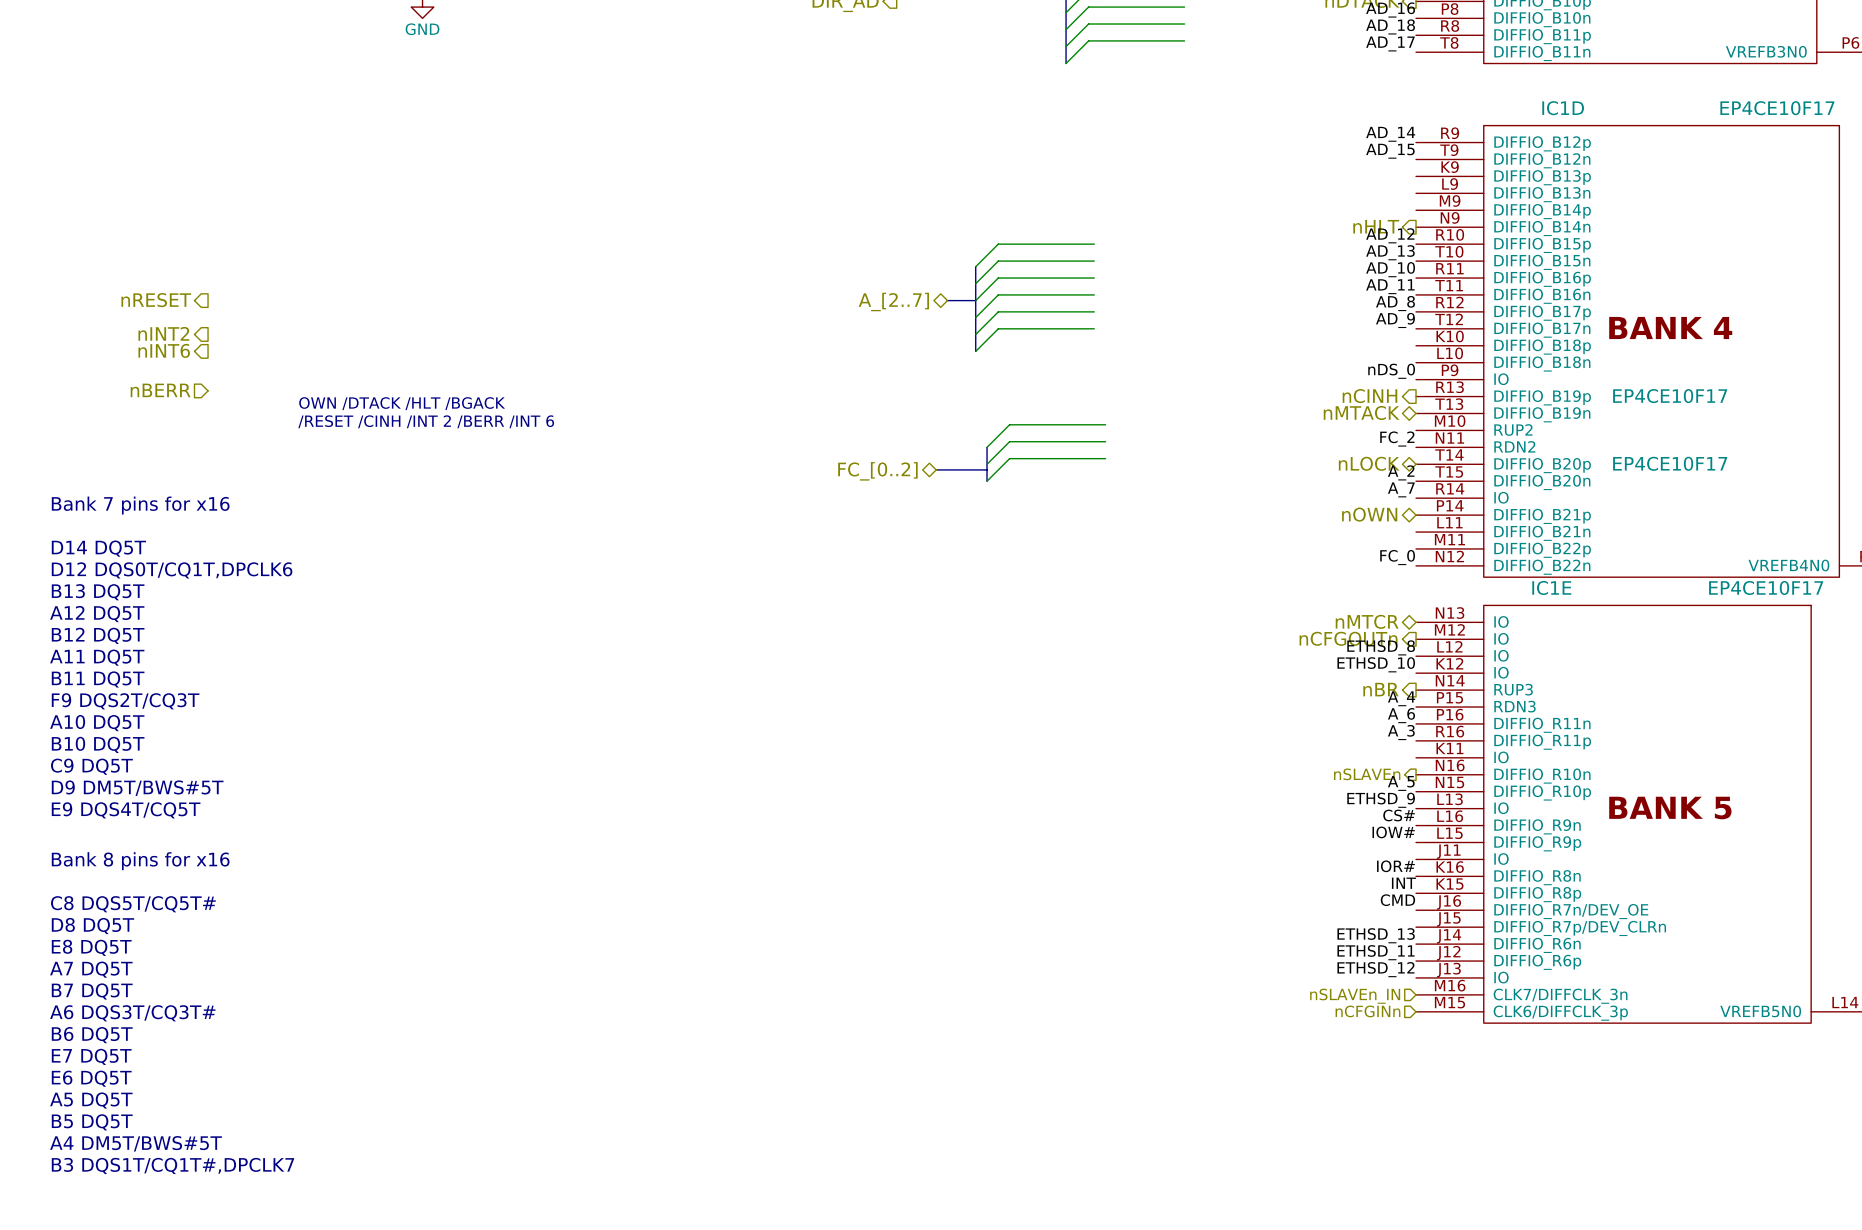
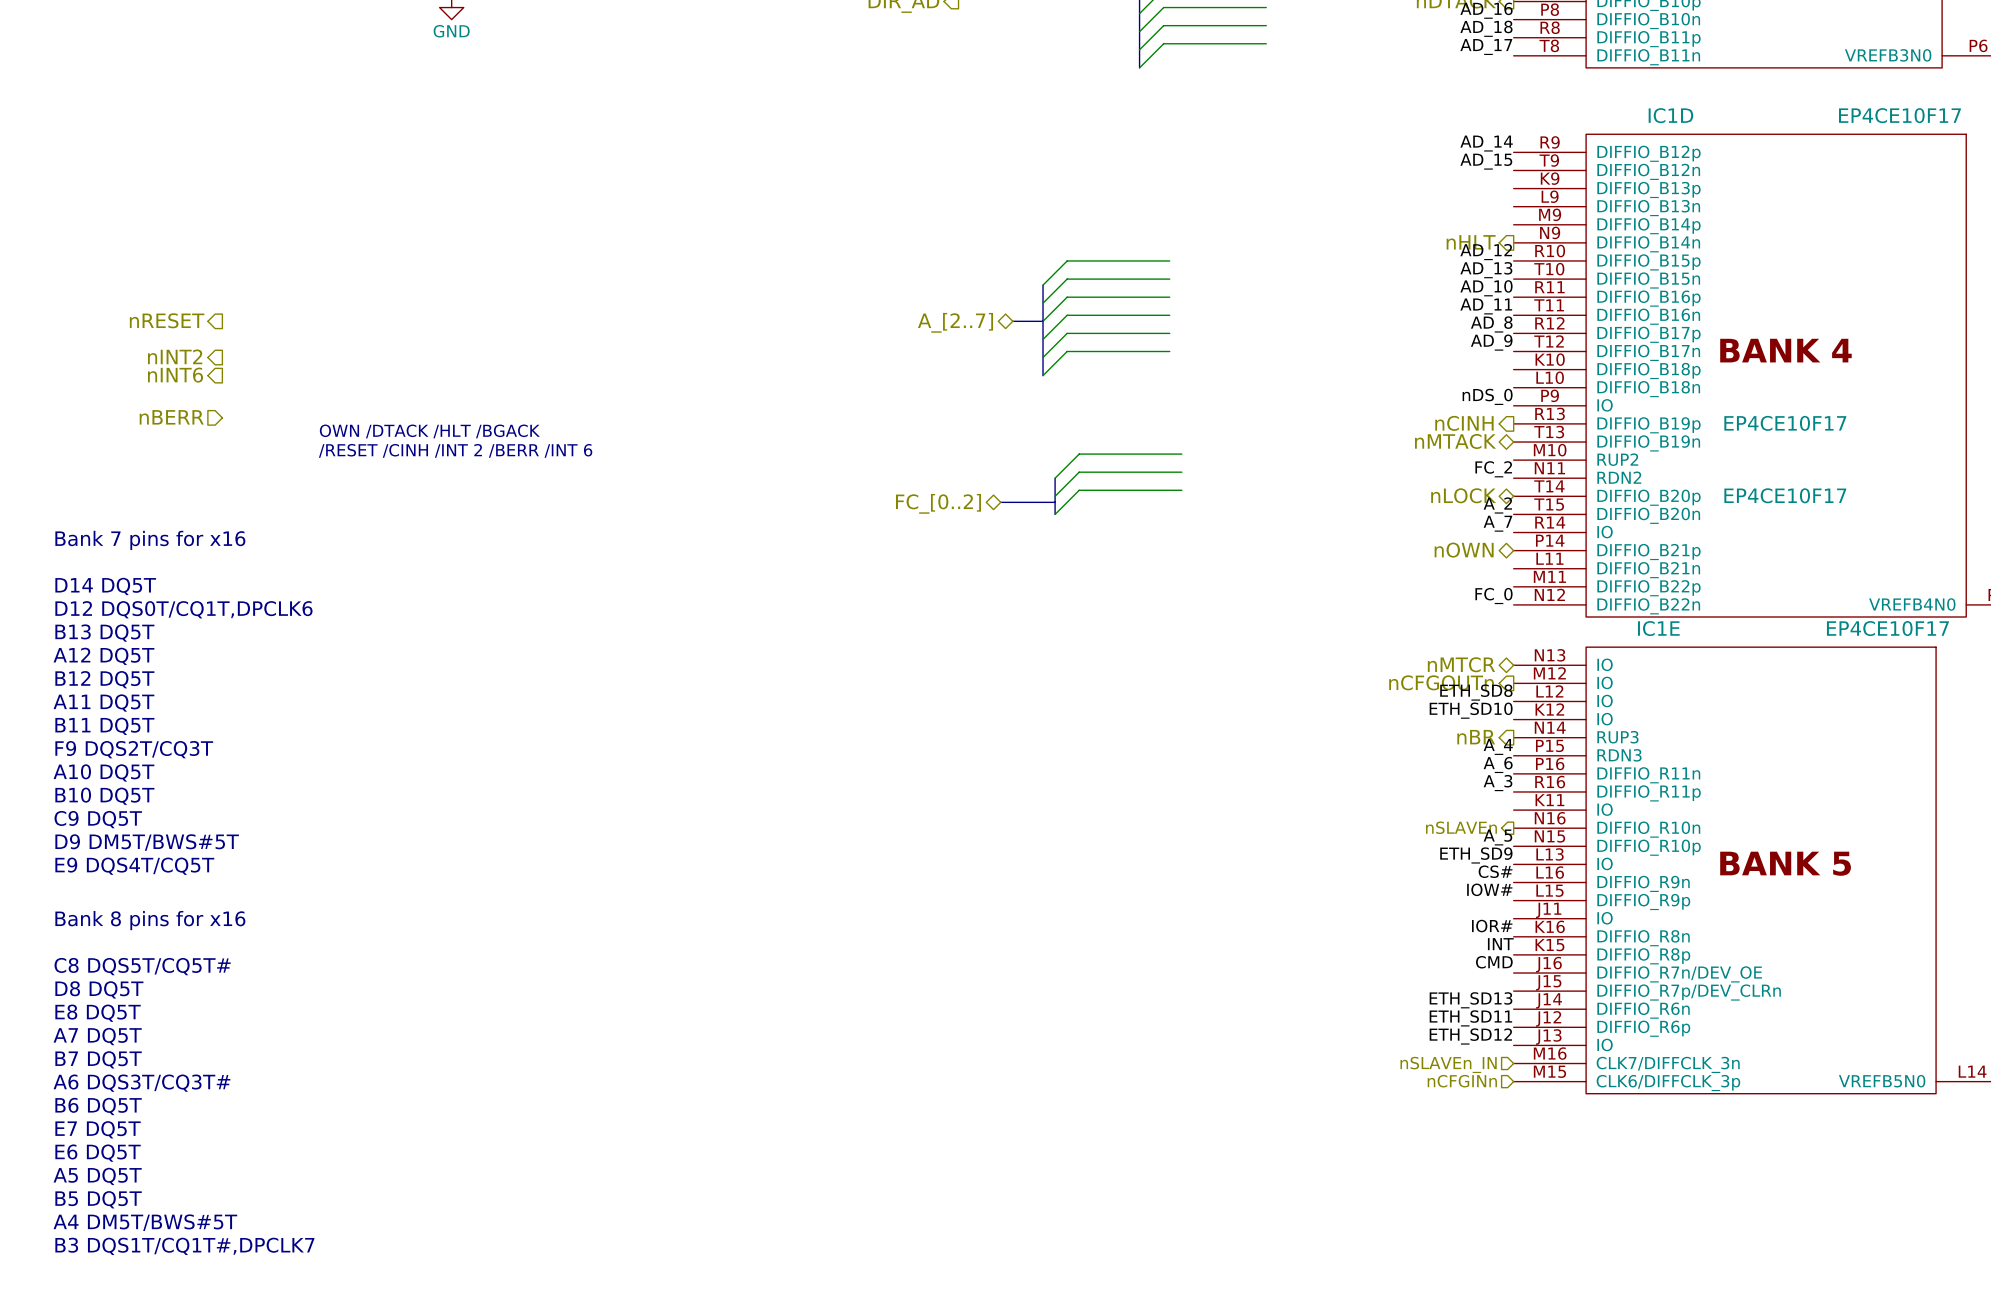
label: ETHSD_8 (1381, 647) -> ETH_SD8 (1476, 692)
label: ETHSD_10 (1376, 664) -> ETH_SD10 (1471, 710)
label: ETHSD_9 (1381, 800) -> ETH_SD9 (1476, 855)
label: ETHSD_13 (1376, 935) -> ETH_SD13 (1471, 1000)
label: ETHSD_11 (1376, 952) -> ETH_SD11 (1470, 1018)
label: ETHSD_12 (1375, 969) -> ETH_SD12 (1470, 1036)

